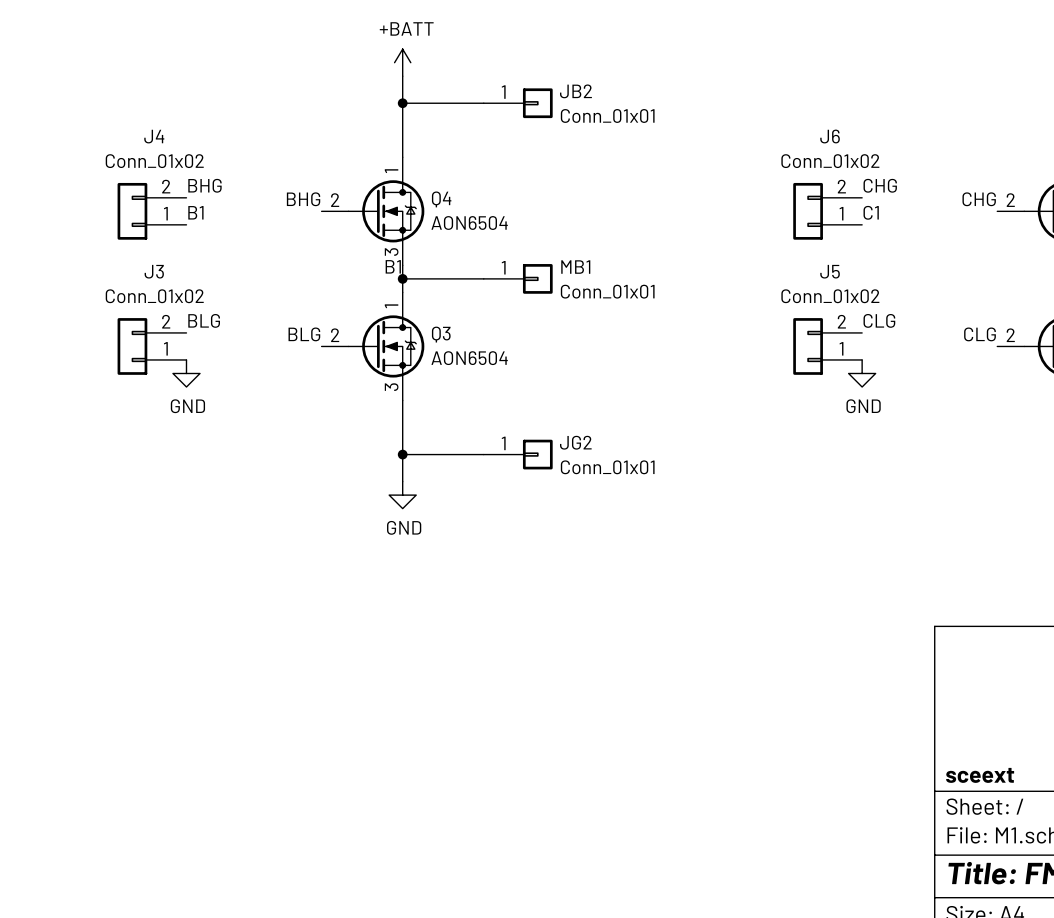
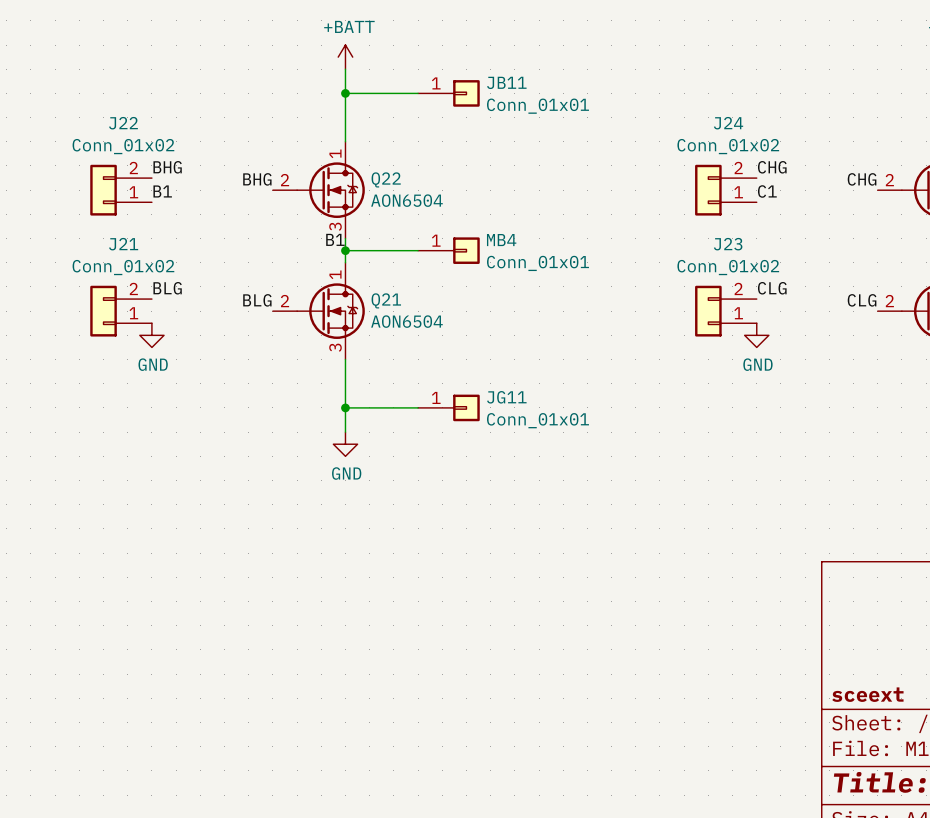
JB2 name: JB2 (575, 91) -> JB11 (506, 82)
J4 name: J4 (154, 136) -> J22 (123, 123)
J6 name: J6 (830, 136) -> J24 (728, 123)
Q4 name: Q4 (441, 199) -> Q22 (386, 179)
MB1 name: MB1 (575, 267) -> MB4 (501, 240)
J3 name: J3 (154, 271) -> J21 (123, 244)
J5 name: J5 (830, 271) -> J23 (728, 244)
Q3 name: Q3 (441, 334) -> Q21 (386, 300)
JG2 name: JG2 (575, 442) -> JG11 (506, 397)

